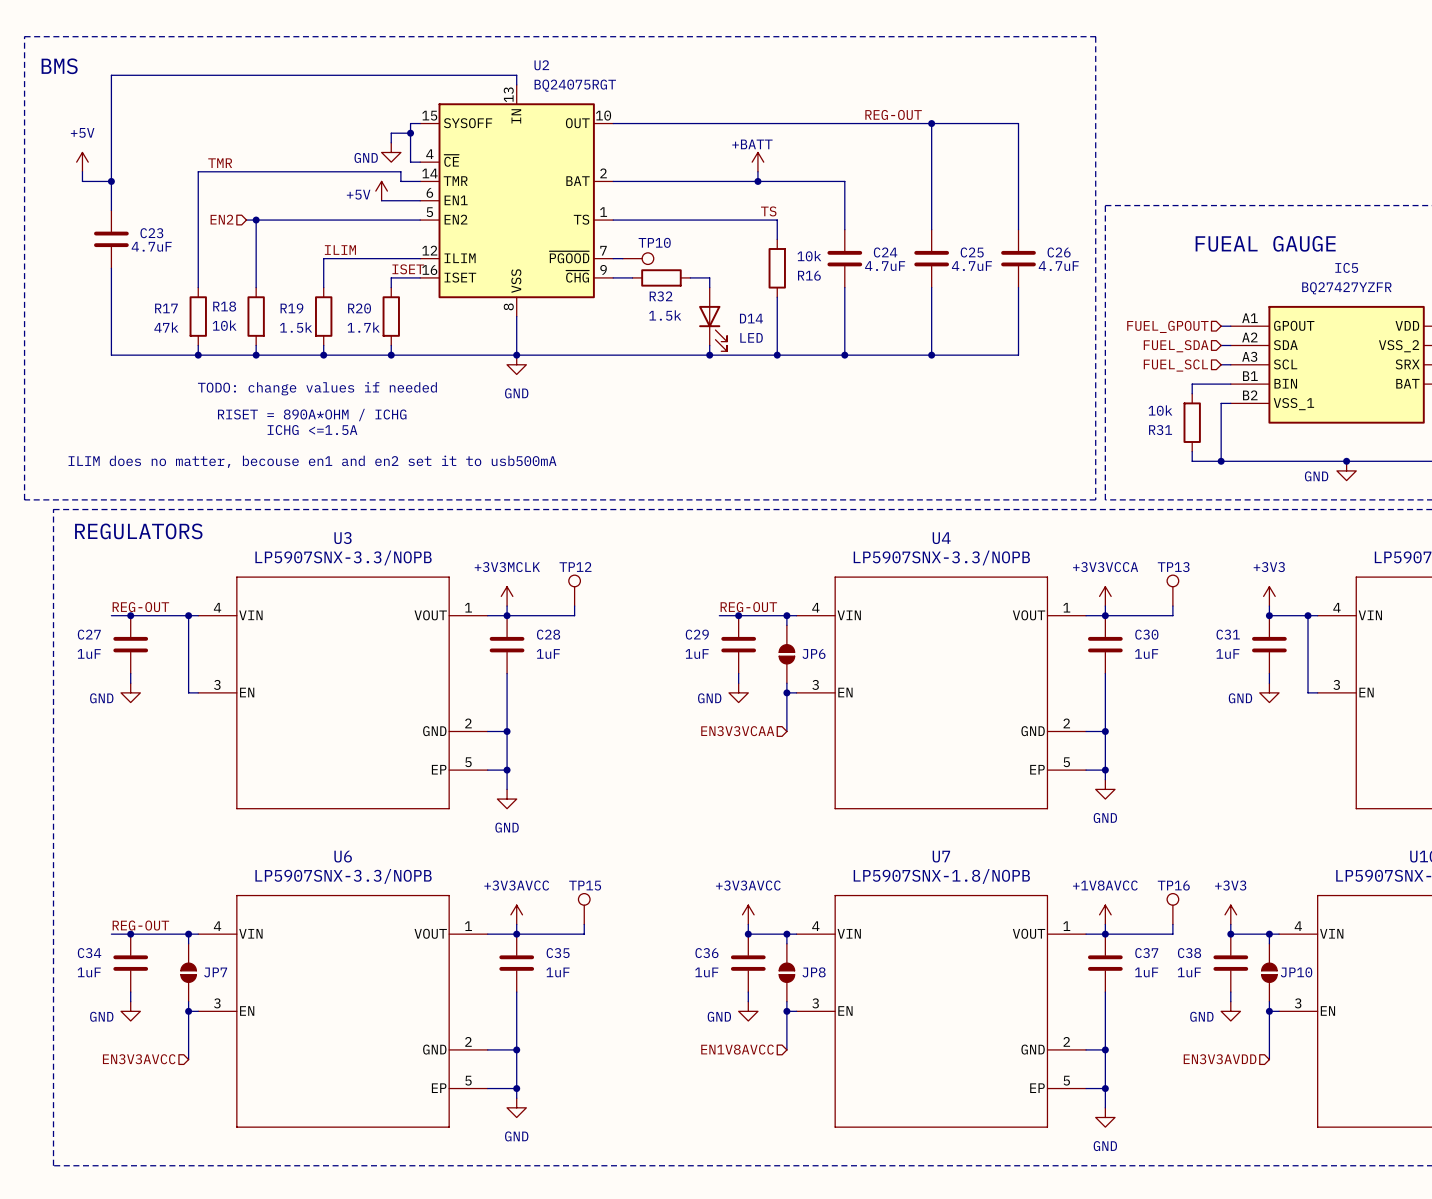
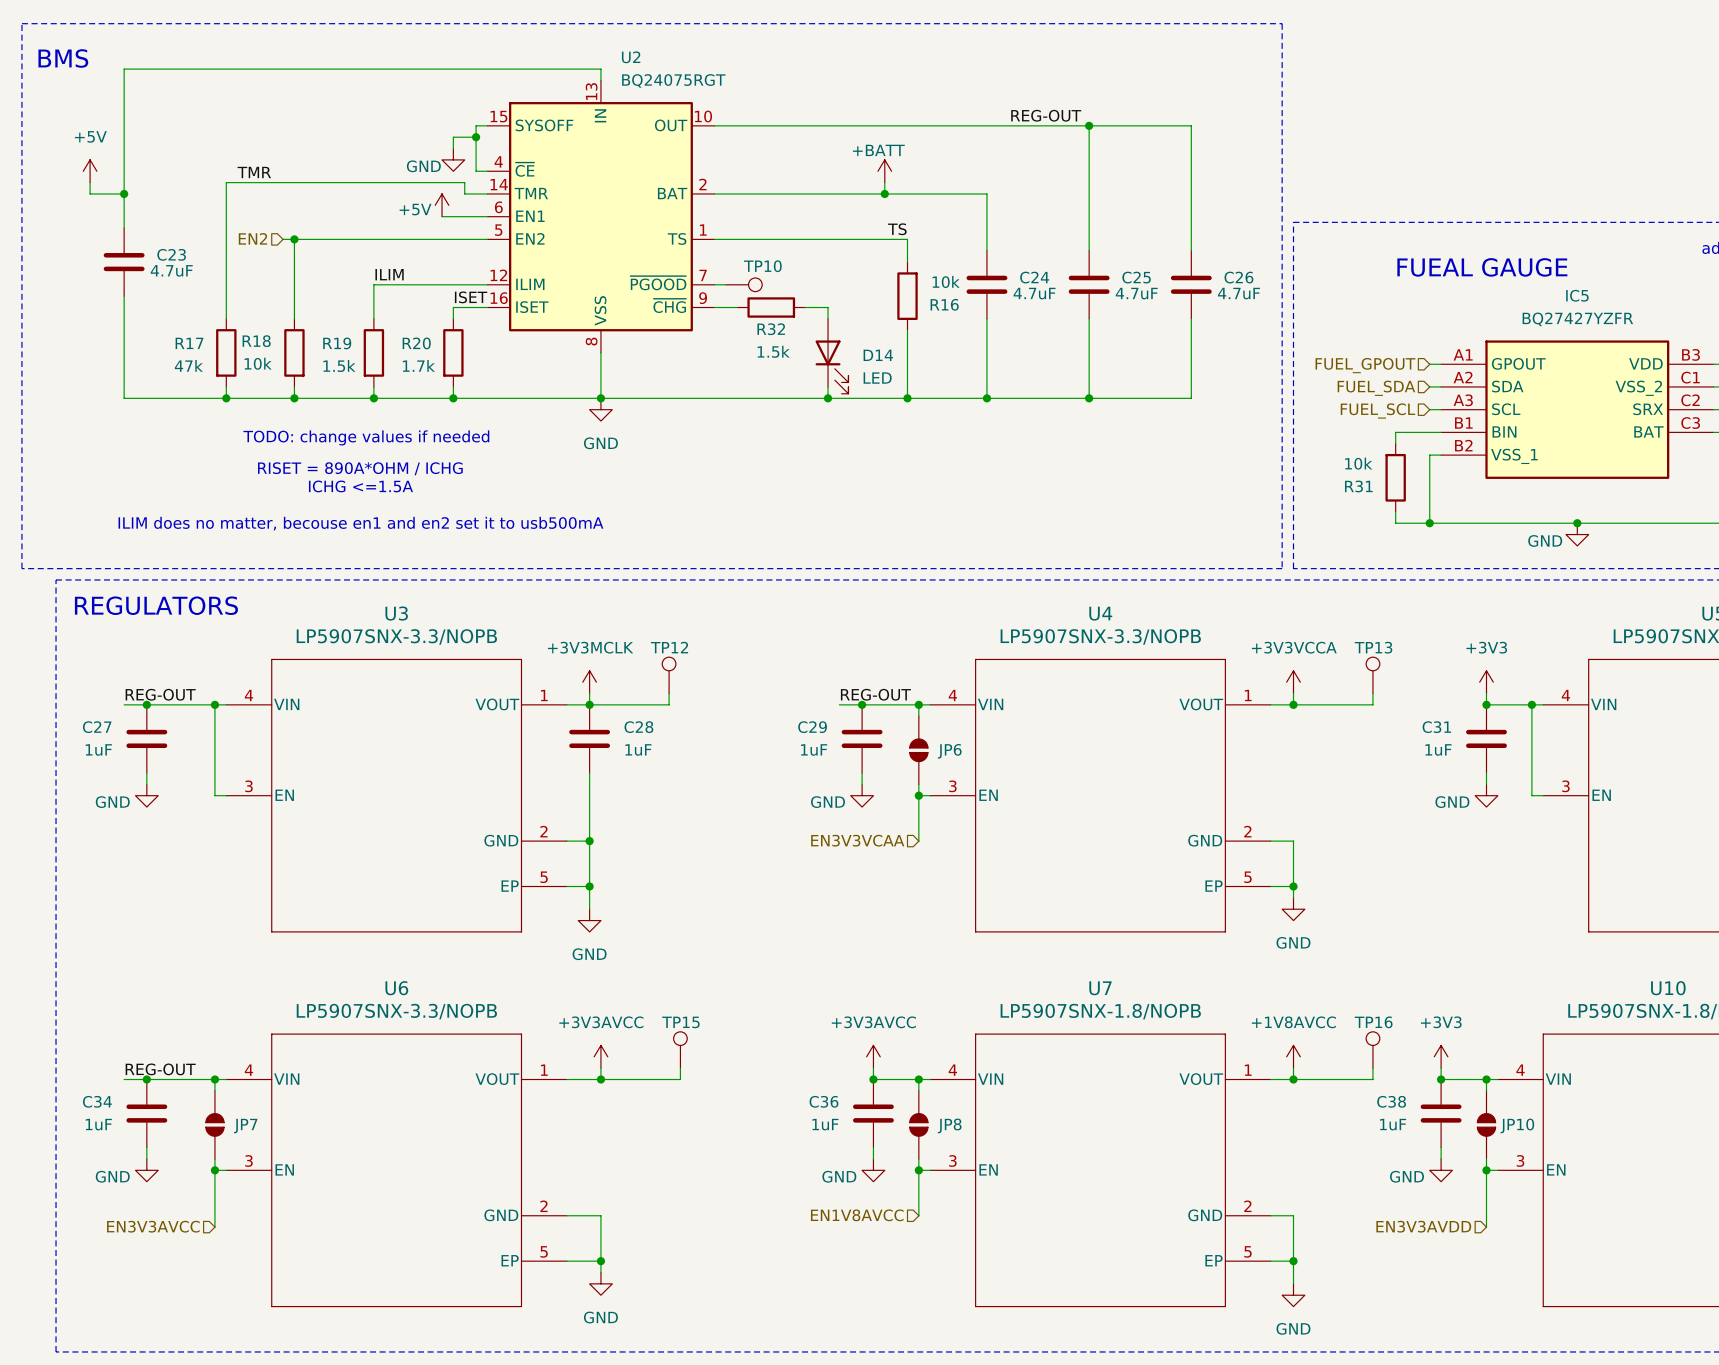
C30: 1uF (1105, 644) -> none
wire: (1105, 673) (1105, 731) -> none
junction: (1105, 731) -> none
C35: 1uF (516, 963) -> none
C37: 1uF (1105, 963) -> none
wire: (516, 992) (516, 1049) -> none
wire: (1105, 992) (1105, 1049) -> none
junction: (516, 1049) -> none
junction: (1105, 1049) -> none

